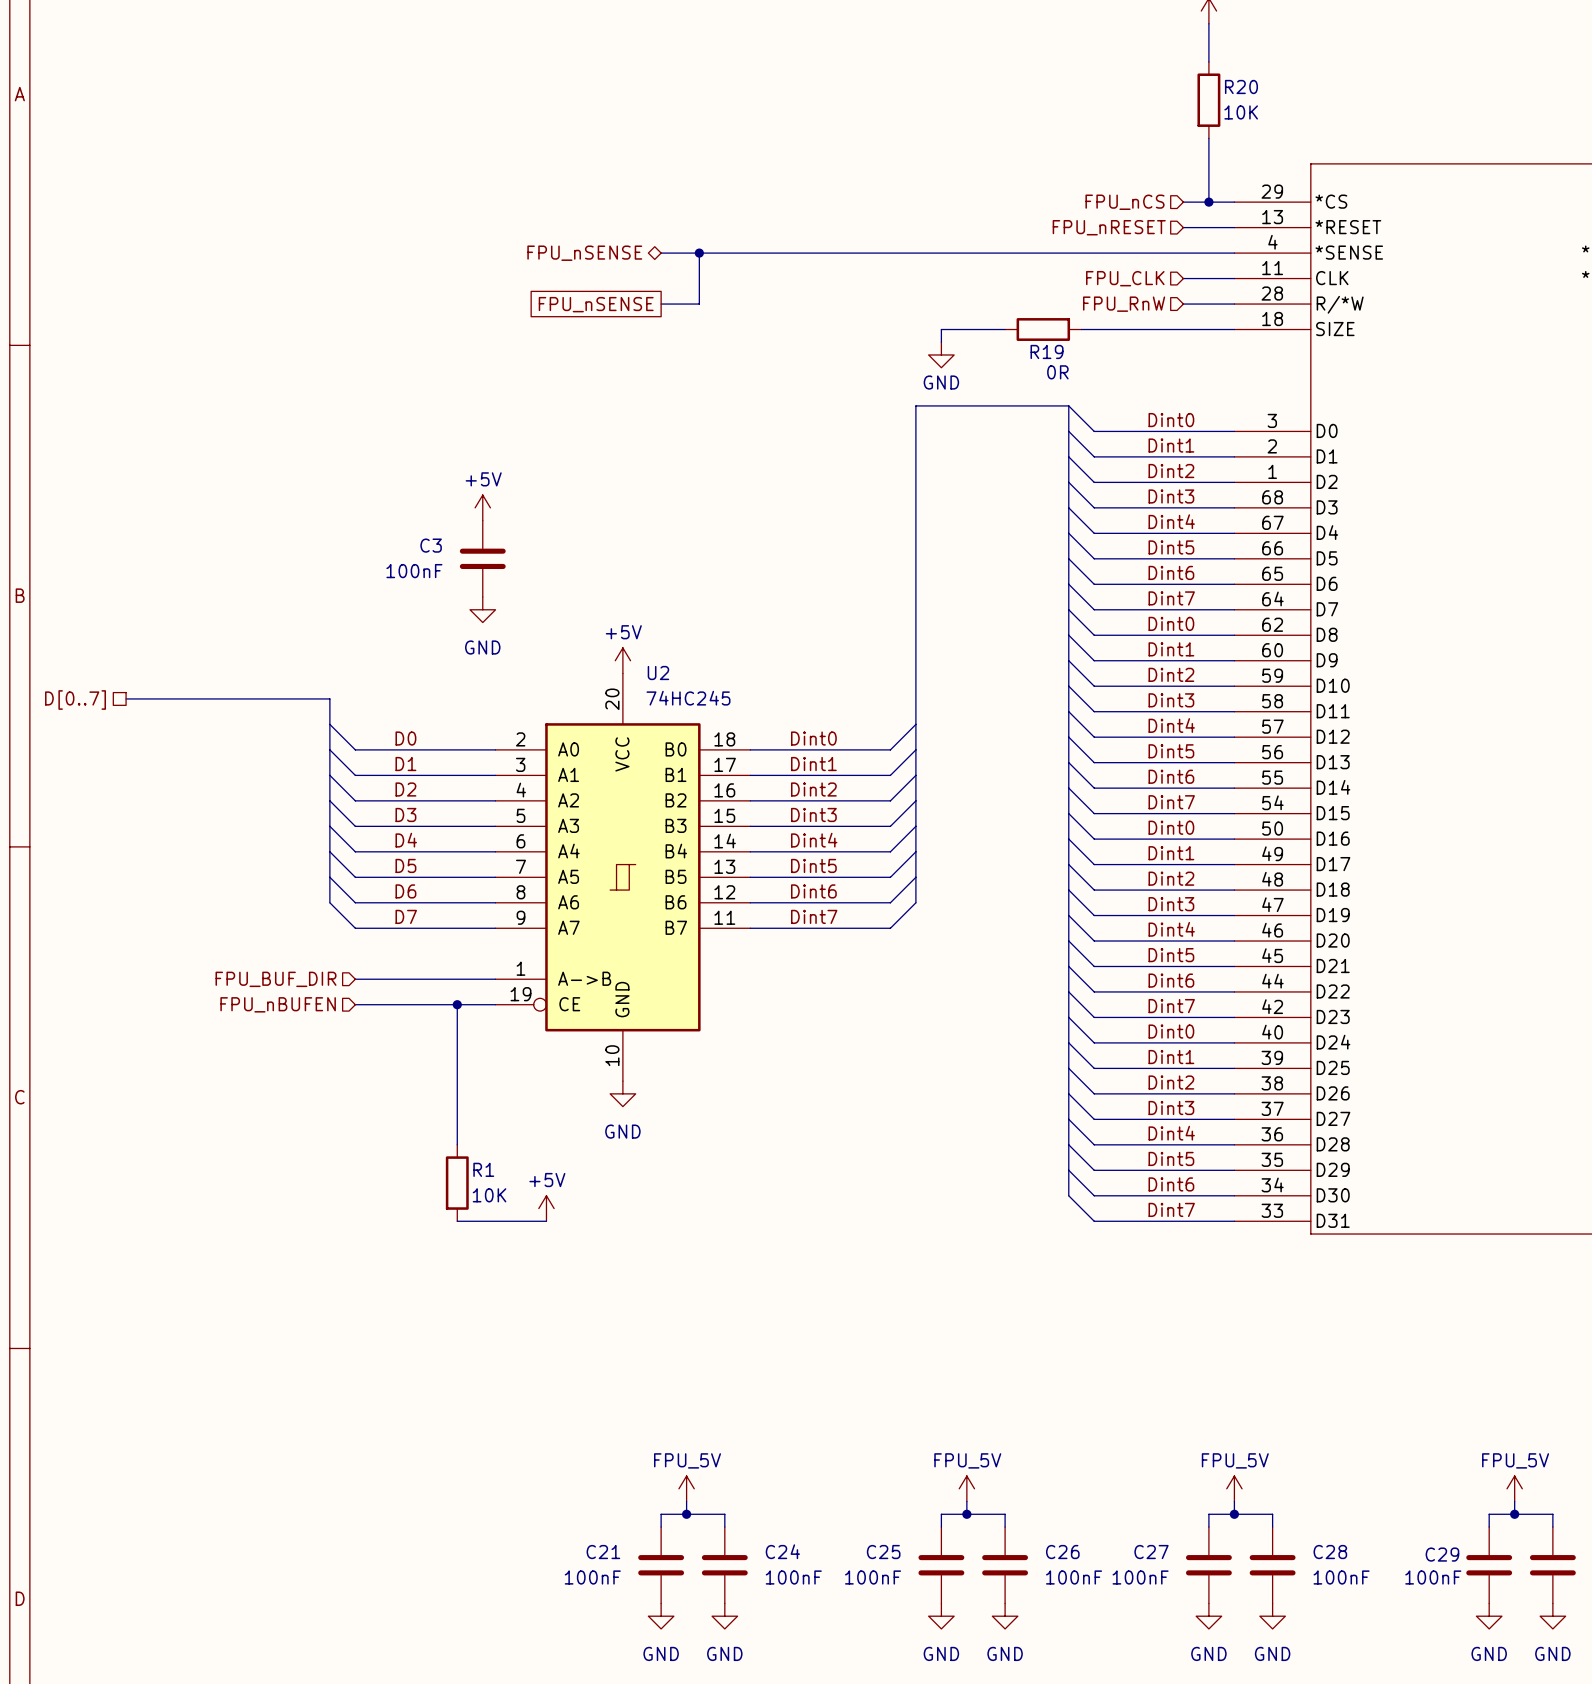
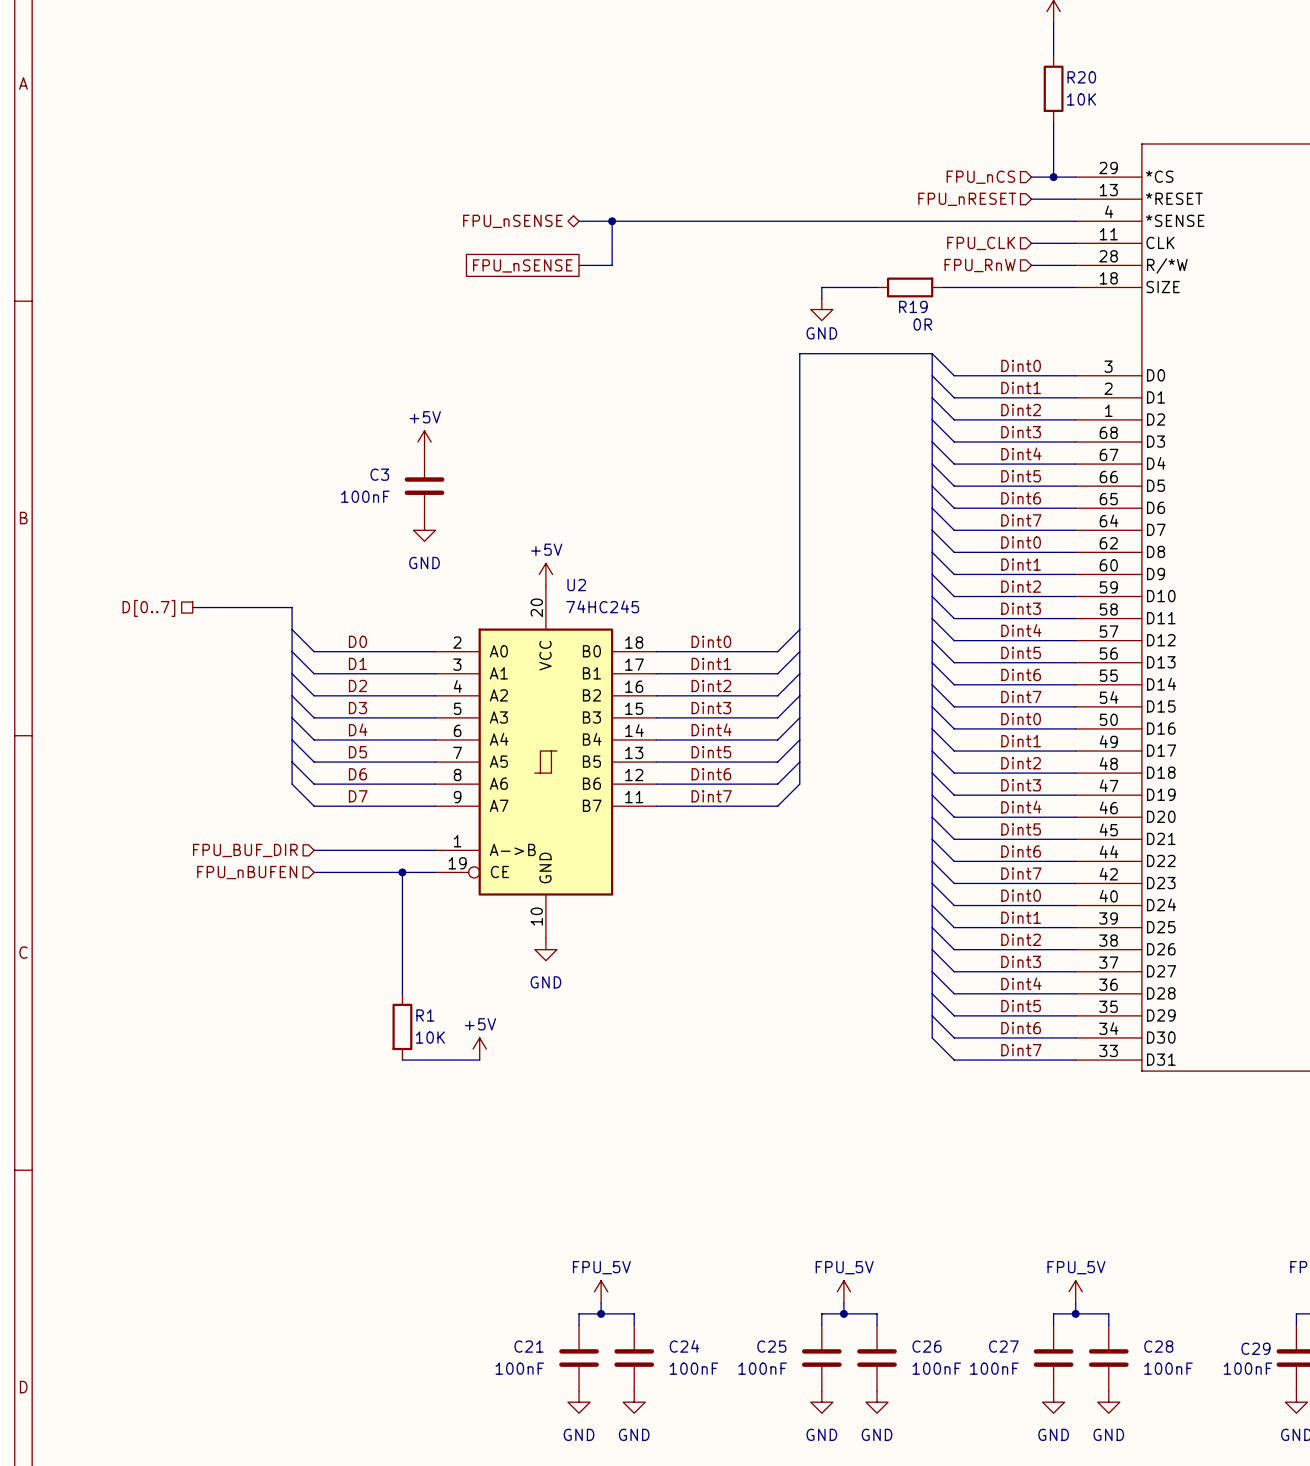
bus: (126, 698) (215, 698) -> none
hierarchical label position: D[0..7] (75, 700) -> D[0..7] (148, 608)

